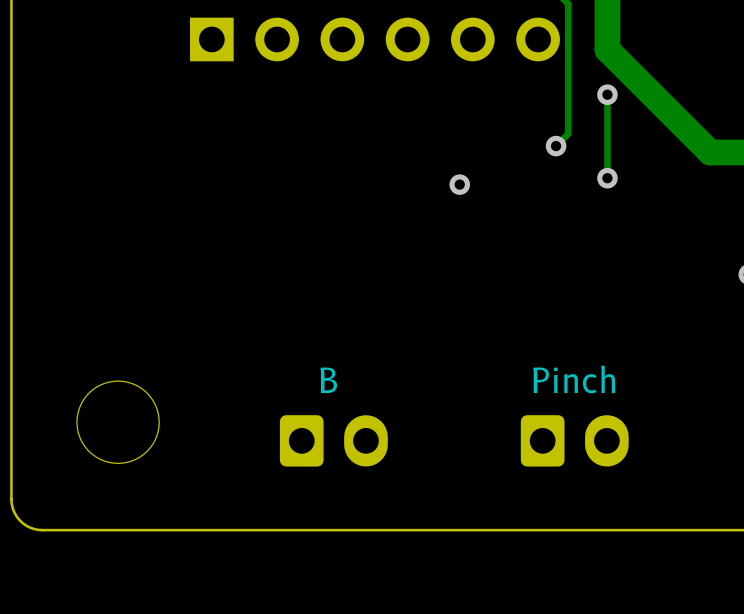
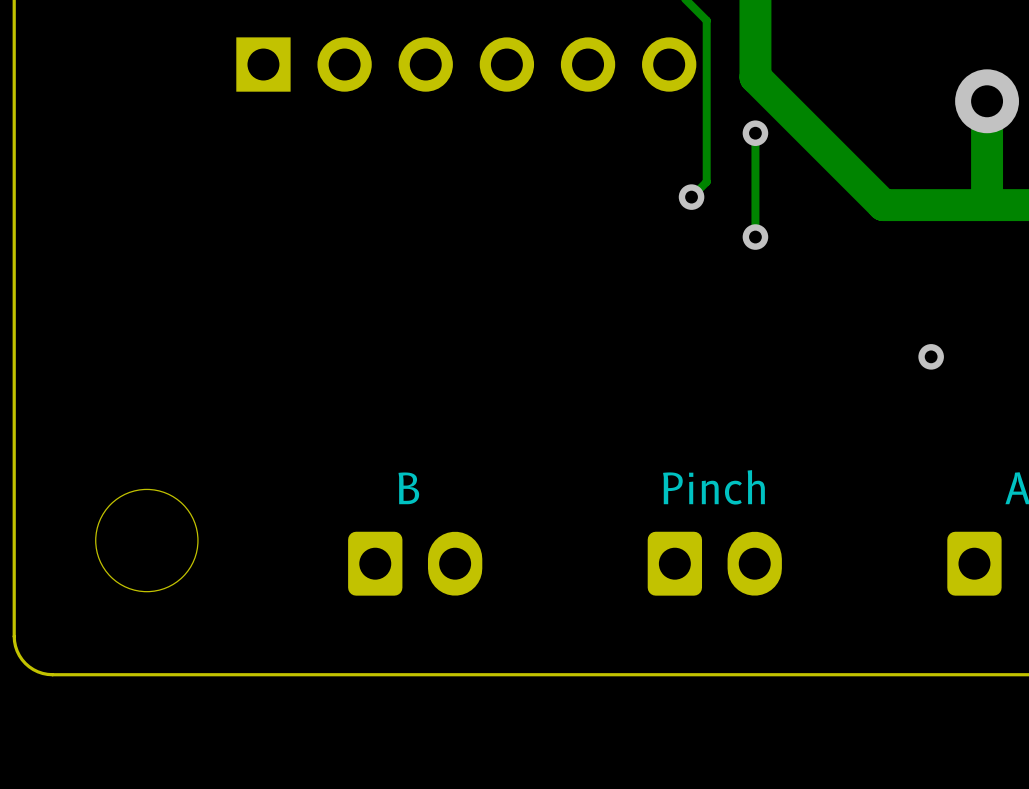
via: (459, 184) -> none

